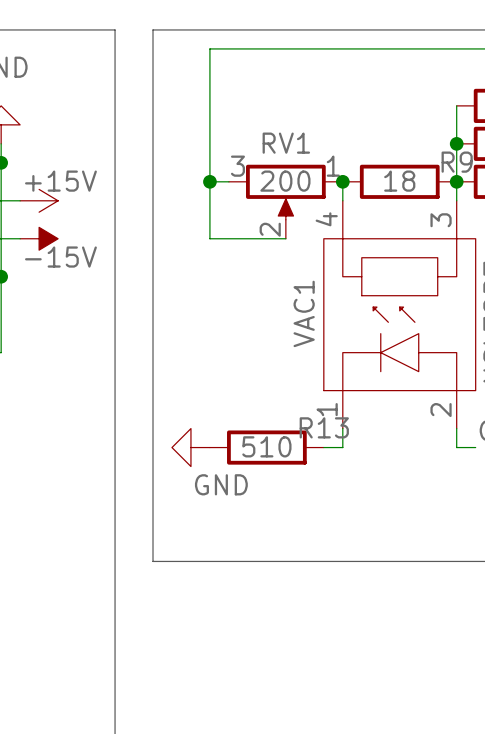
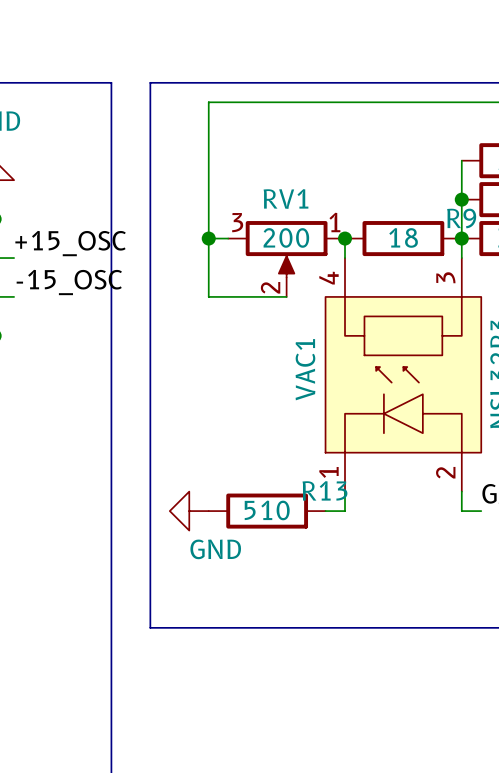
label: none -> +15_OSC (70, 243)
power symbol: +15V (39, 200) -> none
label: none -> -15_OSC (69, 282)
power symbol: -15V (39, 238) -> none

